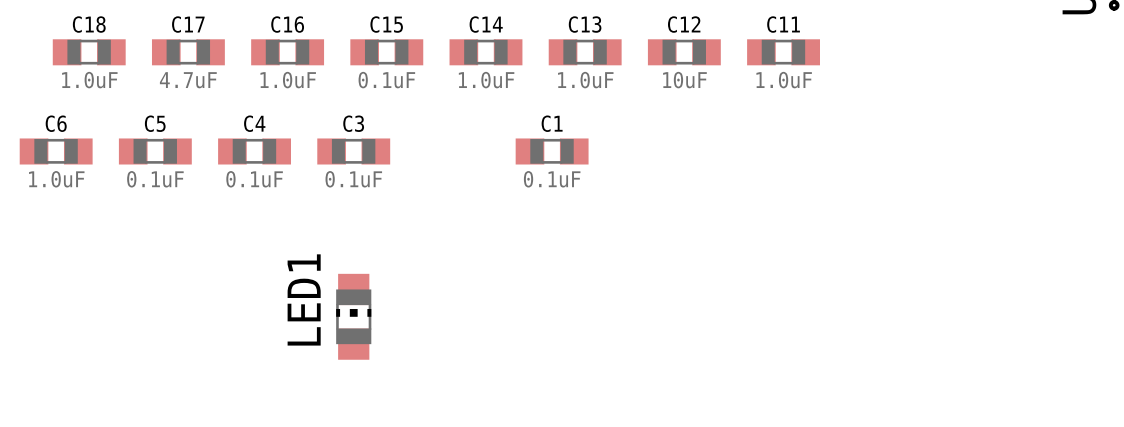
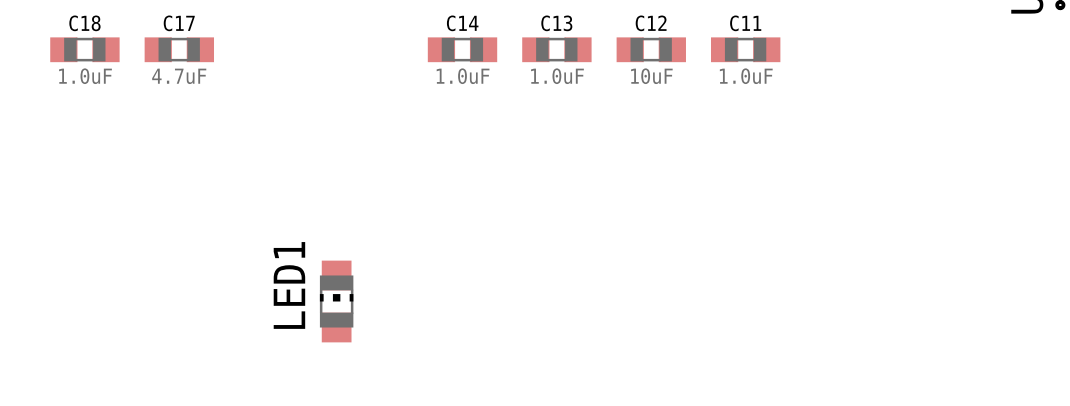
C16: 1.0uF (287, 52) -> none
C15: 0.1uF (386, 52) -> none
C6: 1.0uF (56, 151) -> none
C5: 0.1uF (155, 151) -> none
C4: 0.1uF (254, 151) -> none
C3: 0.1uF (353, 151) -> none
C1: 0.1uF (552, 151) -> none

